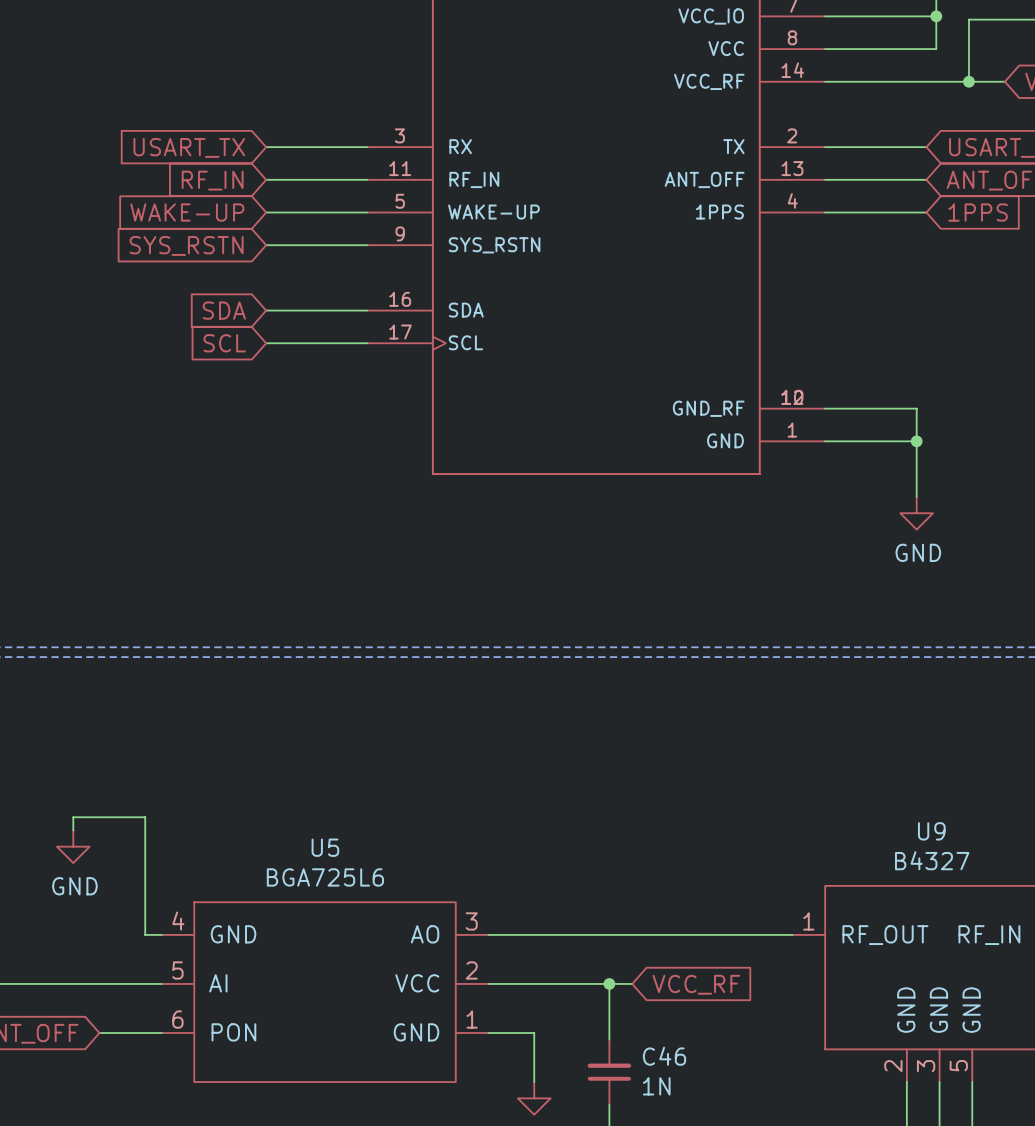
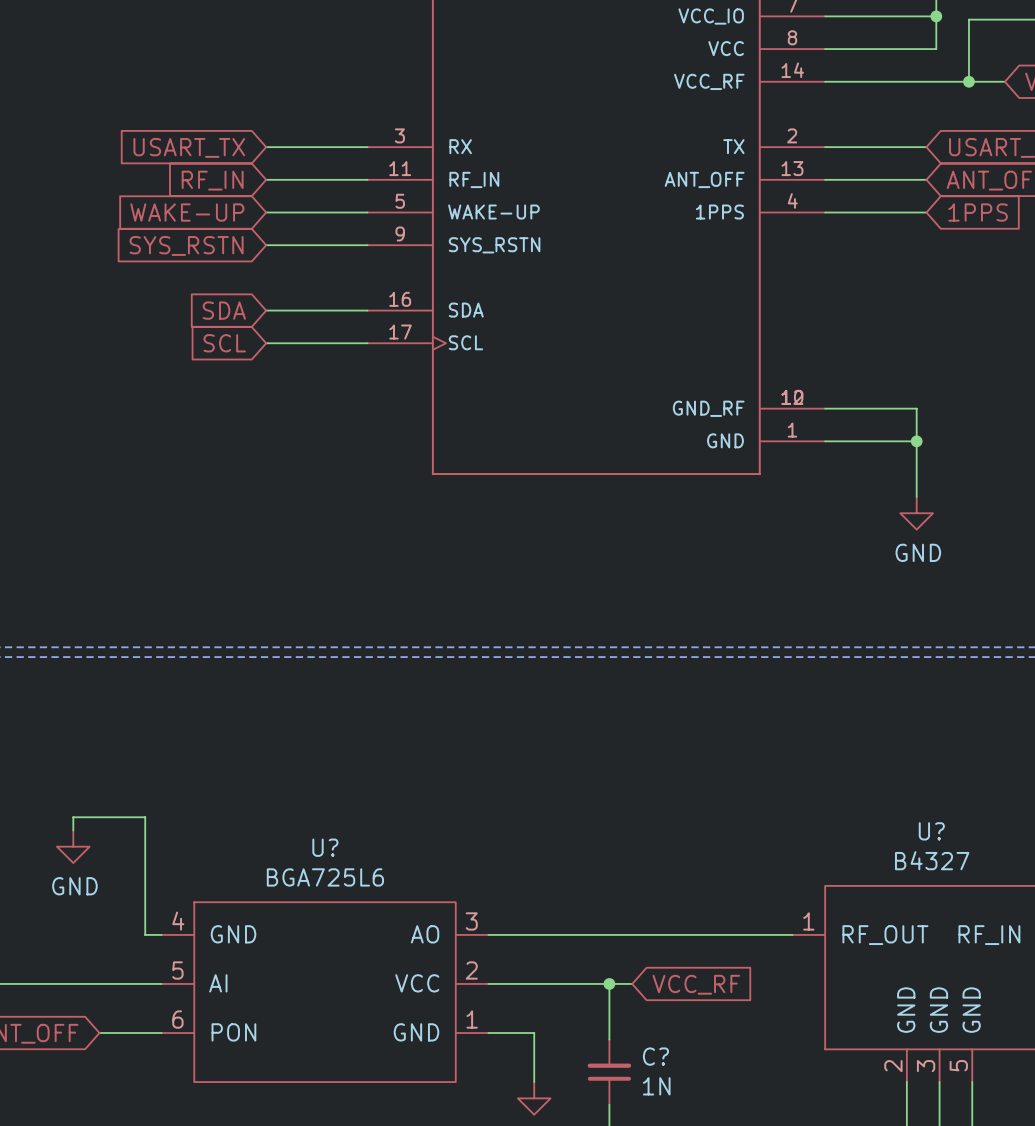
U9 name: U9 (931, 831) -> U? (931, 831)
U5 name: U5 (325, 847) -> U? (325, 847)
C46 name: C46 (664, 1056) -> C? (655, 1056)

